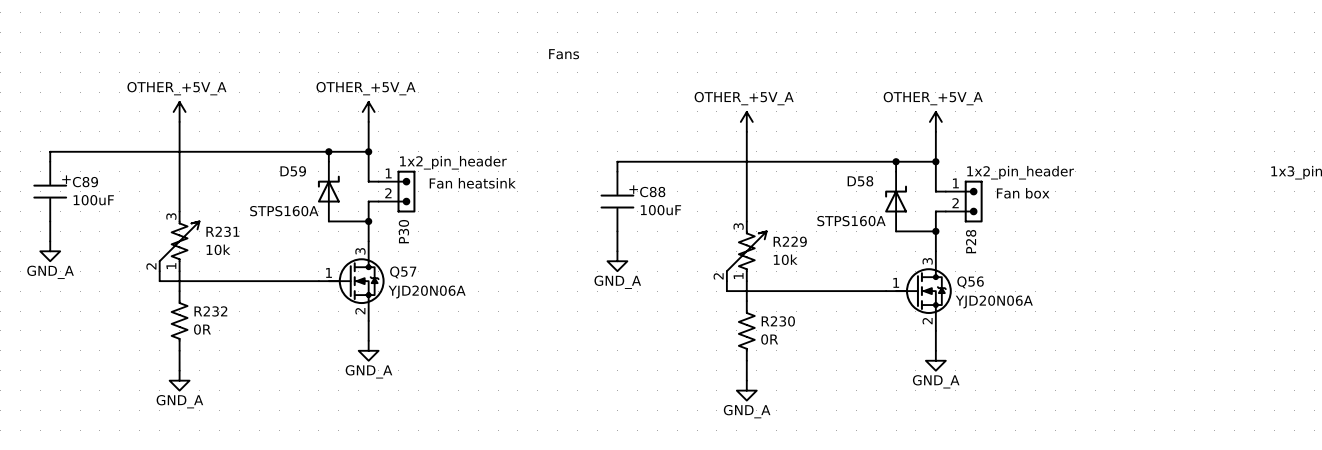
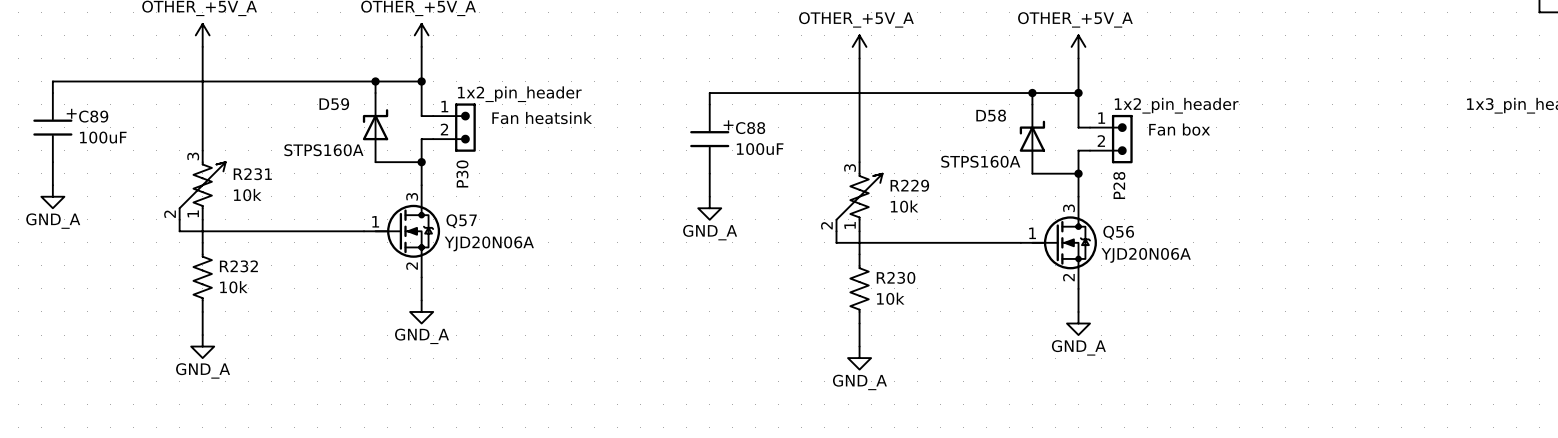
R232 value: 0R (202, 329) -> 10k (233, 287)
R230 value: 0R (769, 339) -> 10k (890, 298)

